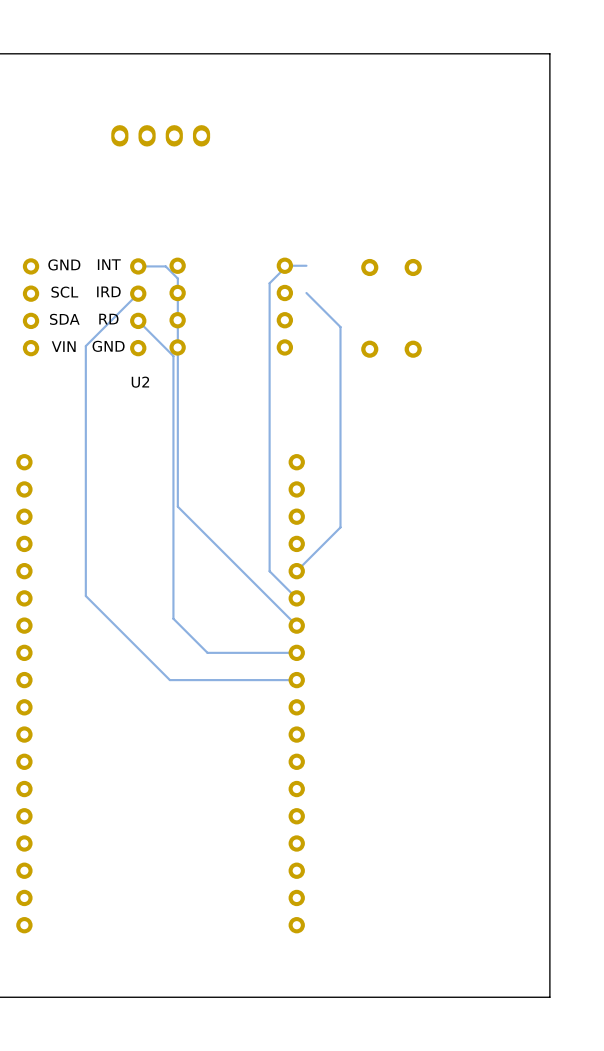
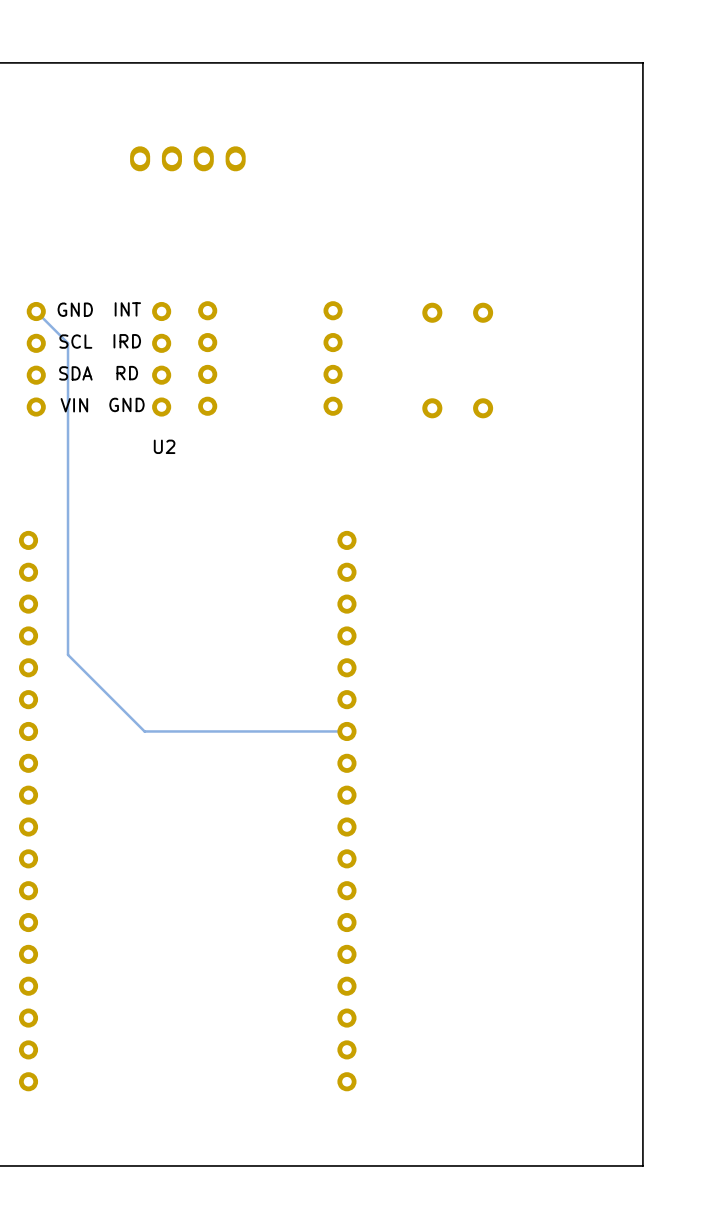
track: (306, 265) (287, 265) (269, 283) (269, 571) (296, 598) -> none
track: (138, 266) (165, 266) (177, 278) (177, 506) (296, 625) -> (36, 311) (68, 343) (68, 654) (144, 731) (346, 731)
track: (306, 292) (340, 327) (340, 527) (296, 571) -> none
track: (138, 293) (85, 346) (85, 596) (169, 680) (296, 680) -> none
track: (138, 320) (173, 356) (173, 618) (207, 652) (296, 652) -> none

